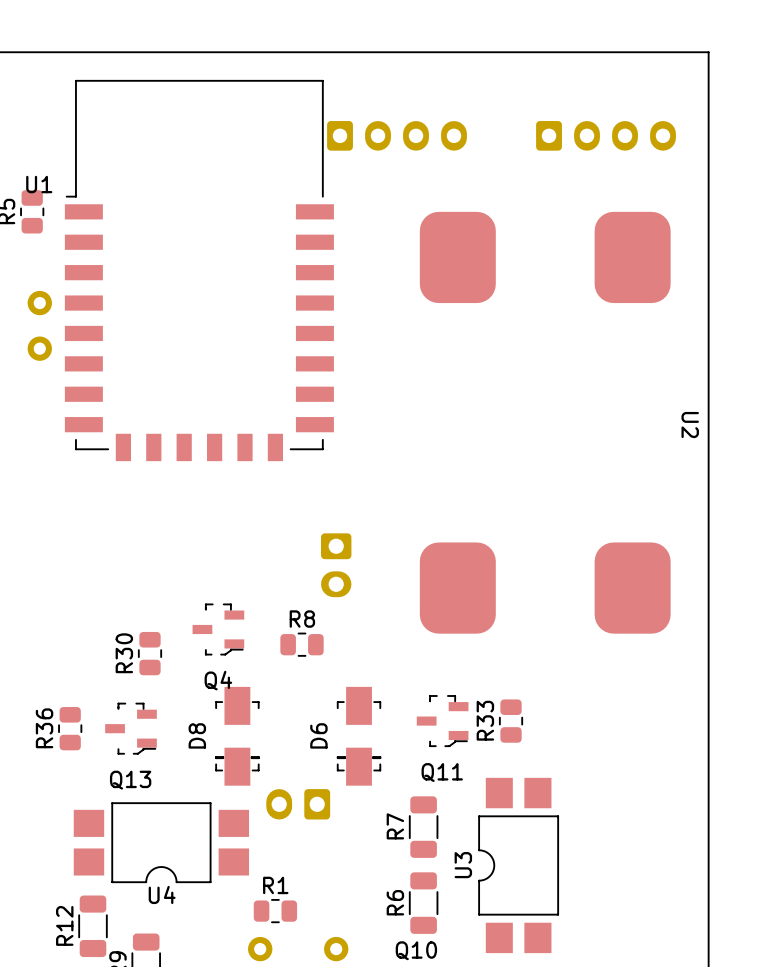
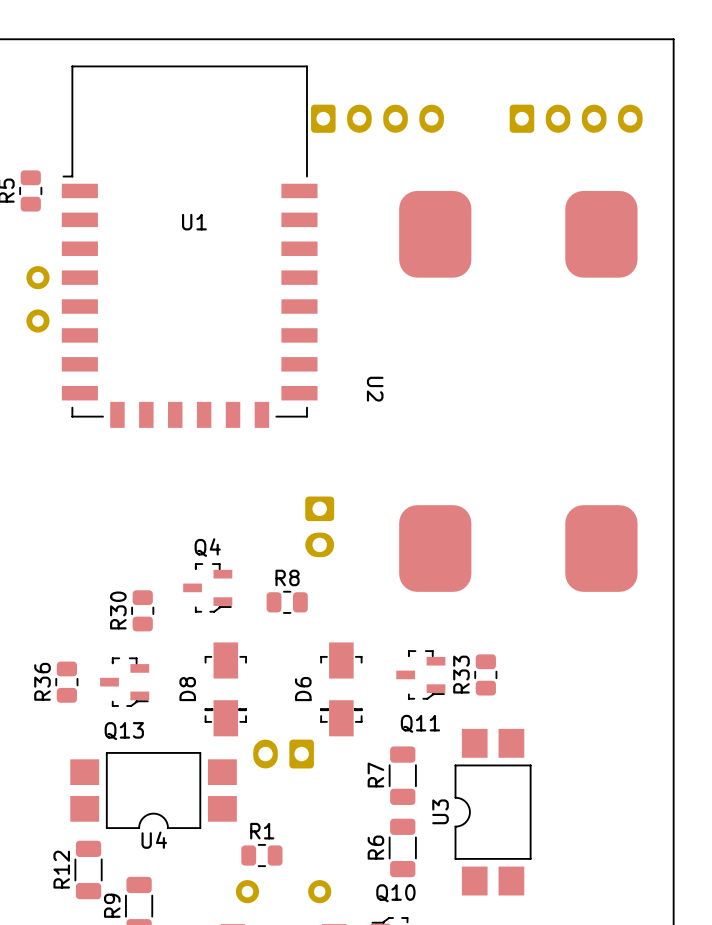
U1 name position: U1 (39, 184) -> U1 (194, 222)
U2 name position: U2 (690, 425) -> U2 (375, 389)
Q4 name position: Q4 (218, 680) -> Q4 (207, 547)

